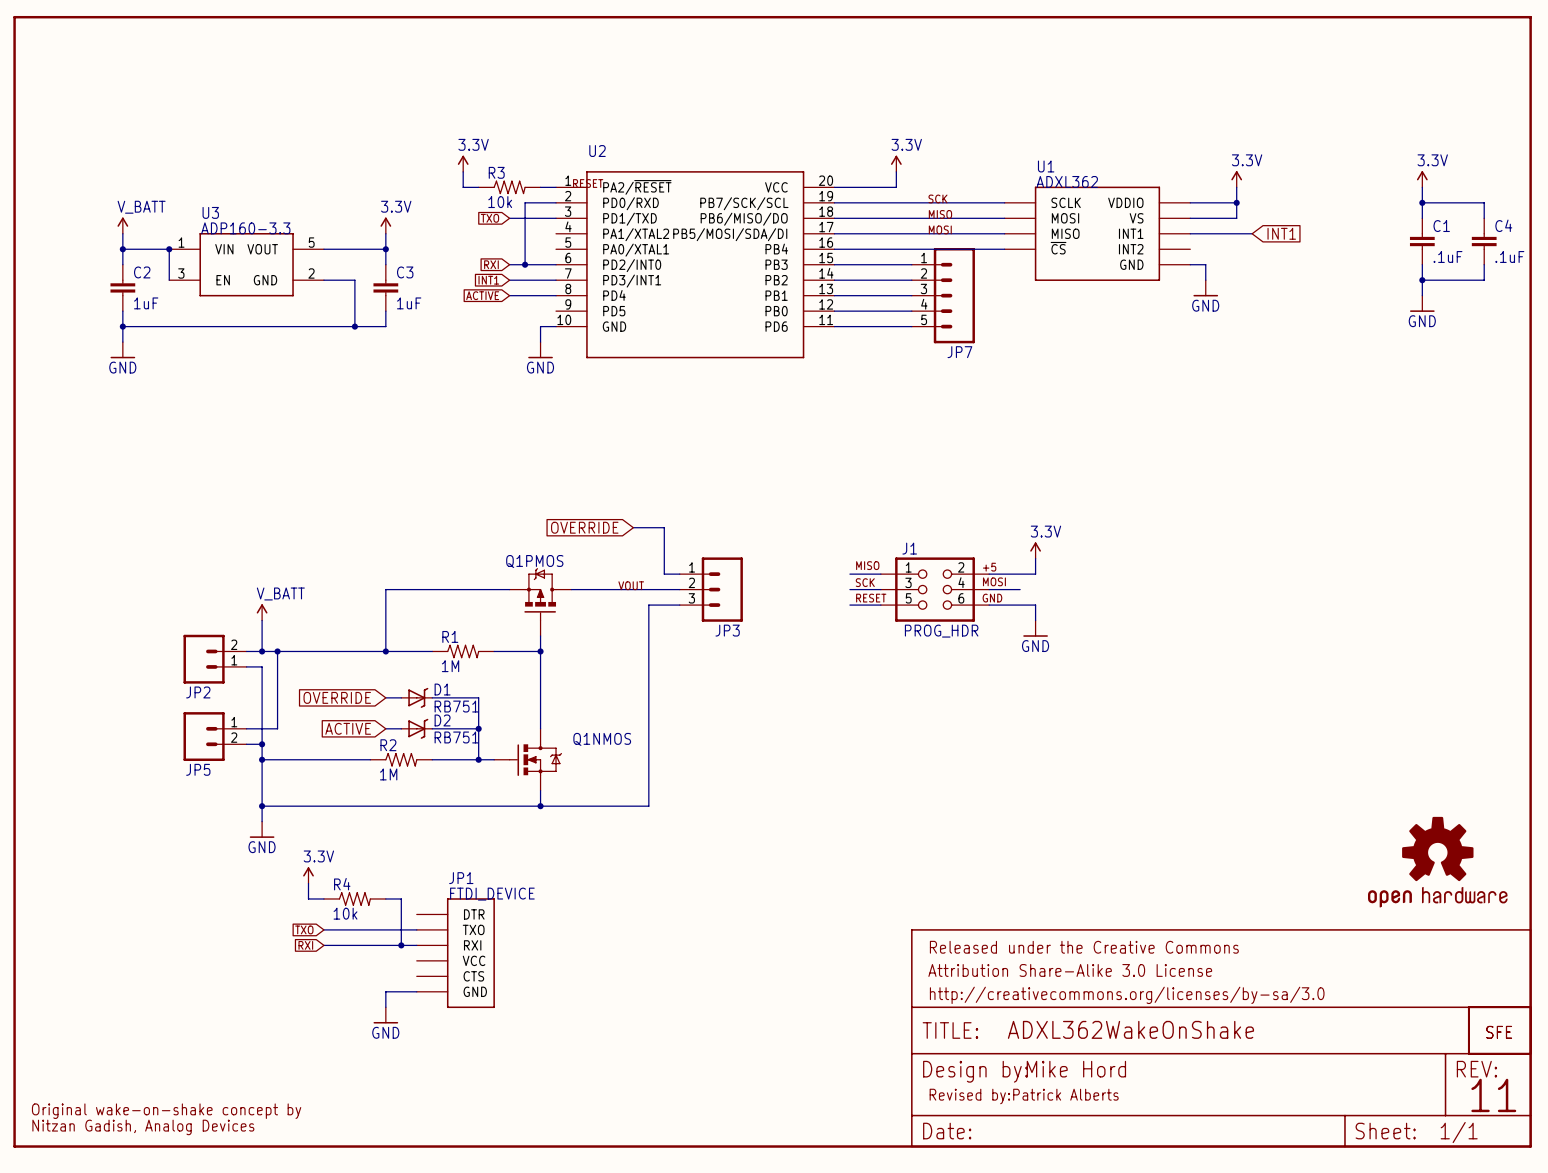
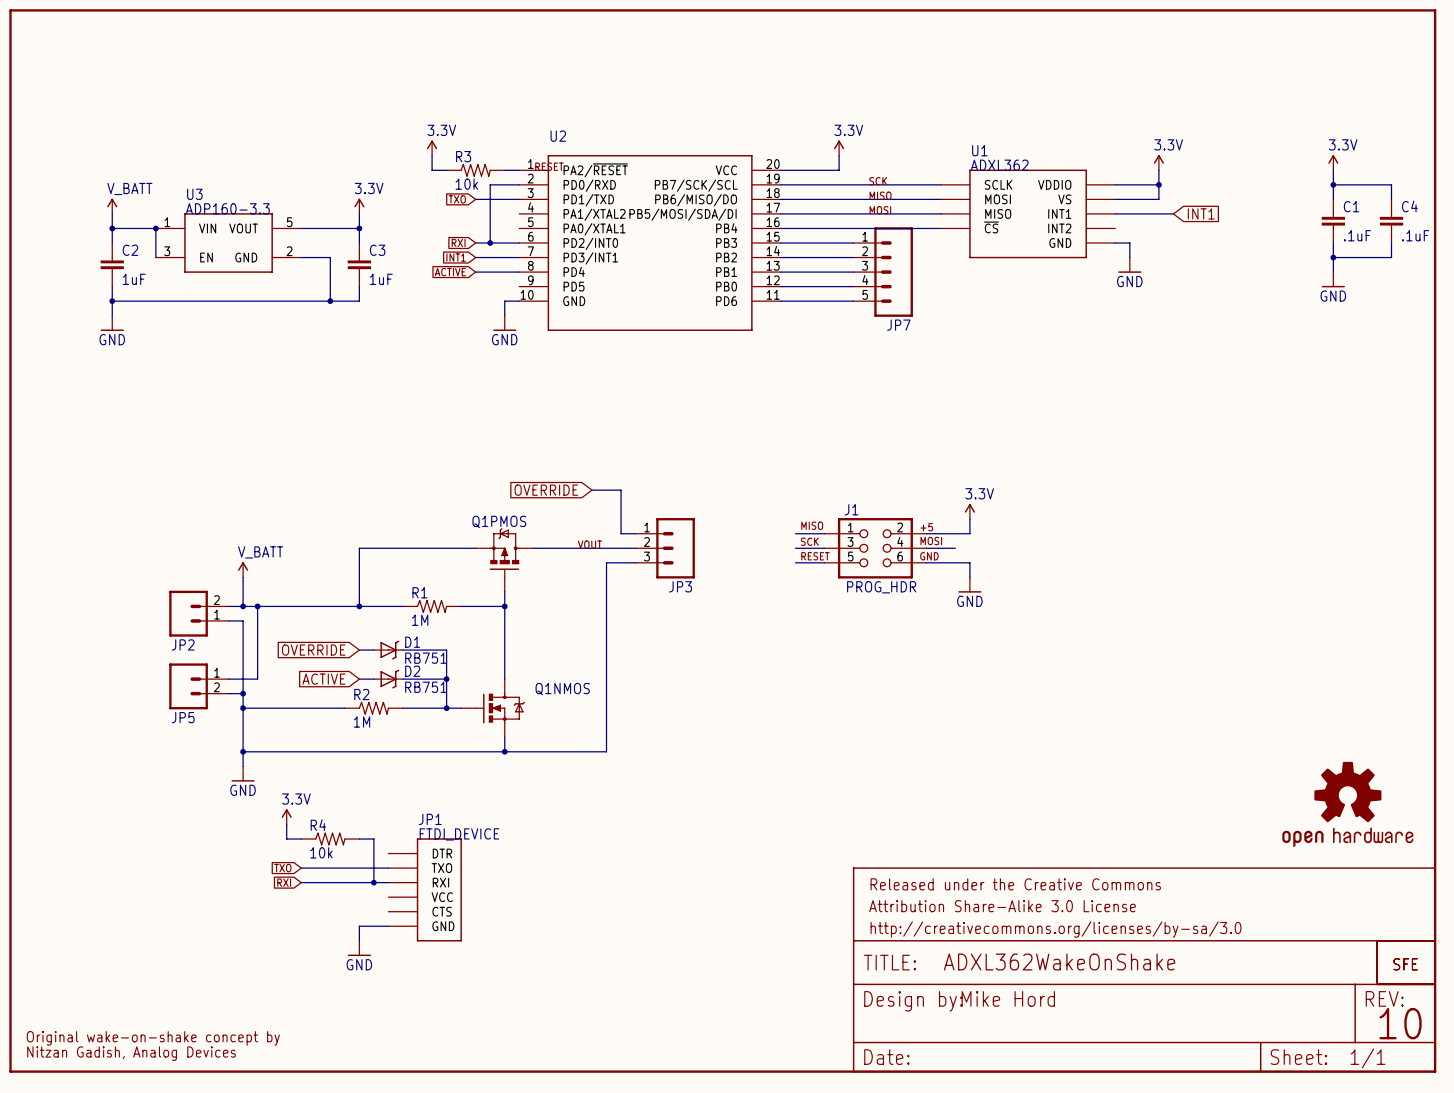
text: 11 (1493, 1095) -> 10 (1400, 1023)
text: Revised by:Patrick Alberts (1024, 1096) -> none

